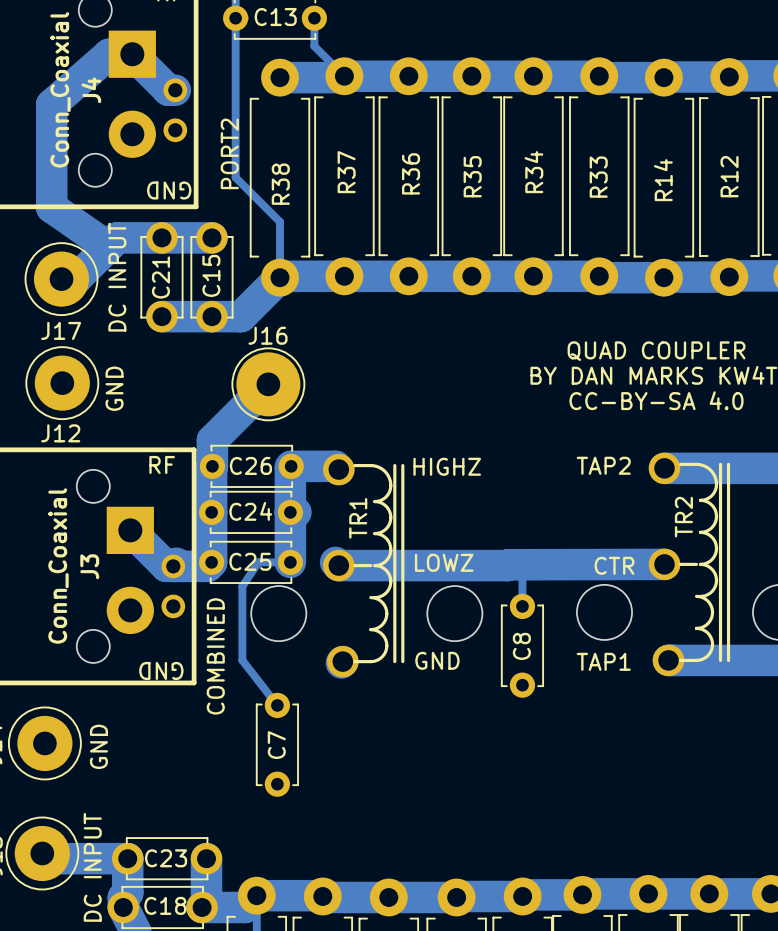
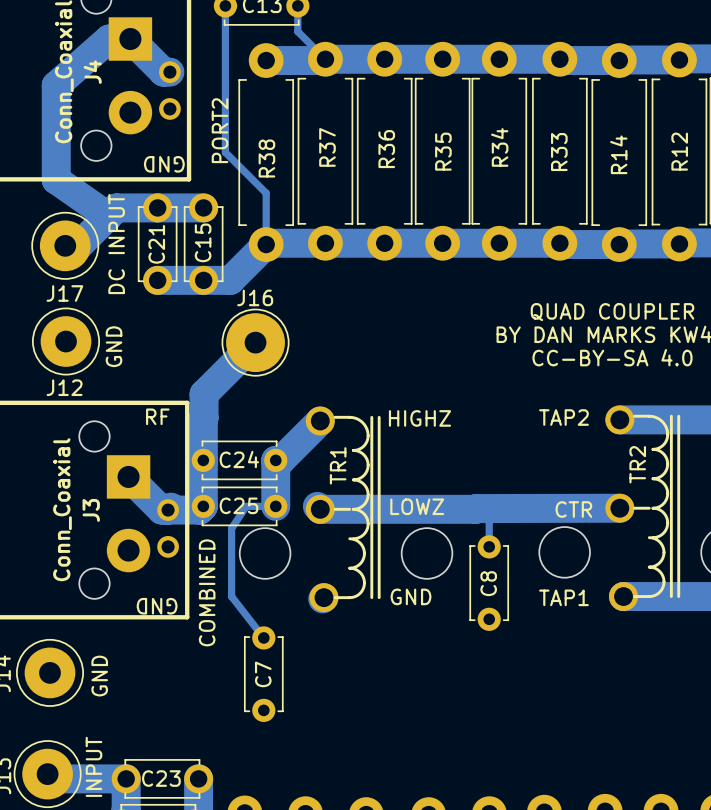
C26: (251, 466) -> none
bottom track: (338, 469) (335, 466) (291, 466) (290, 512) -> (320, 421) (280, 460)

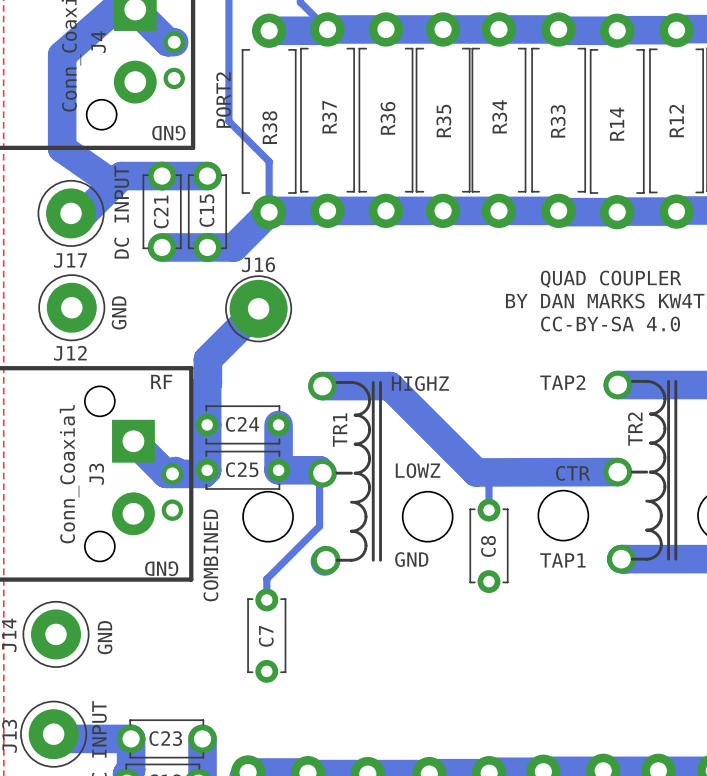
bottom track: (320, 421) (280, 460) (275, 460) -> none
bottom track: (275, 506) (246, 506) (231, 528) (231, 596) (263, 637) -> (278, 470) (319, 470) (319, 526) (266, 579) (266, 599)
bottom track: (476, 508) (320, 509) -> (476, 472) (389, 386) (322, 386)

